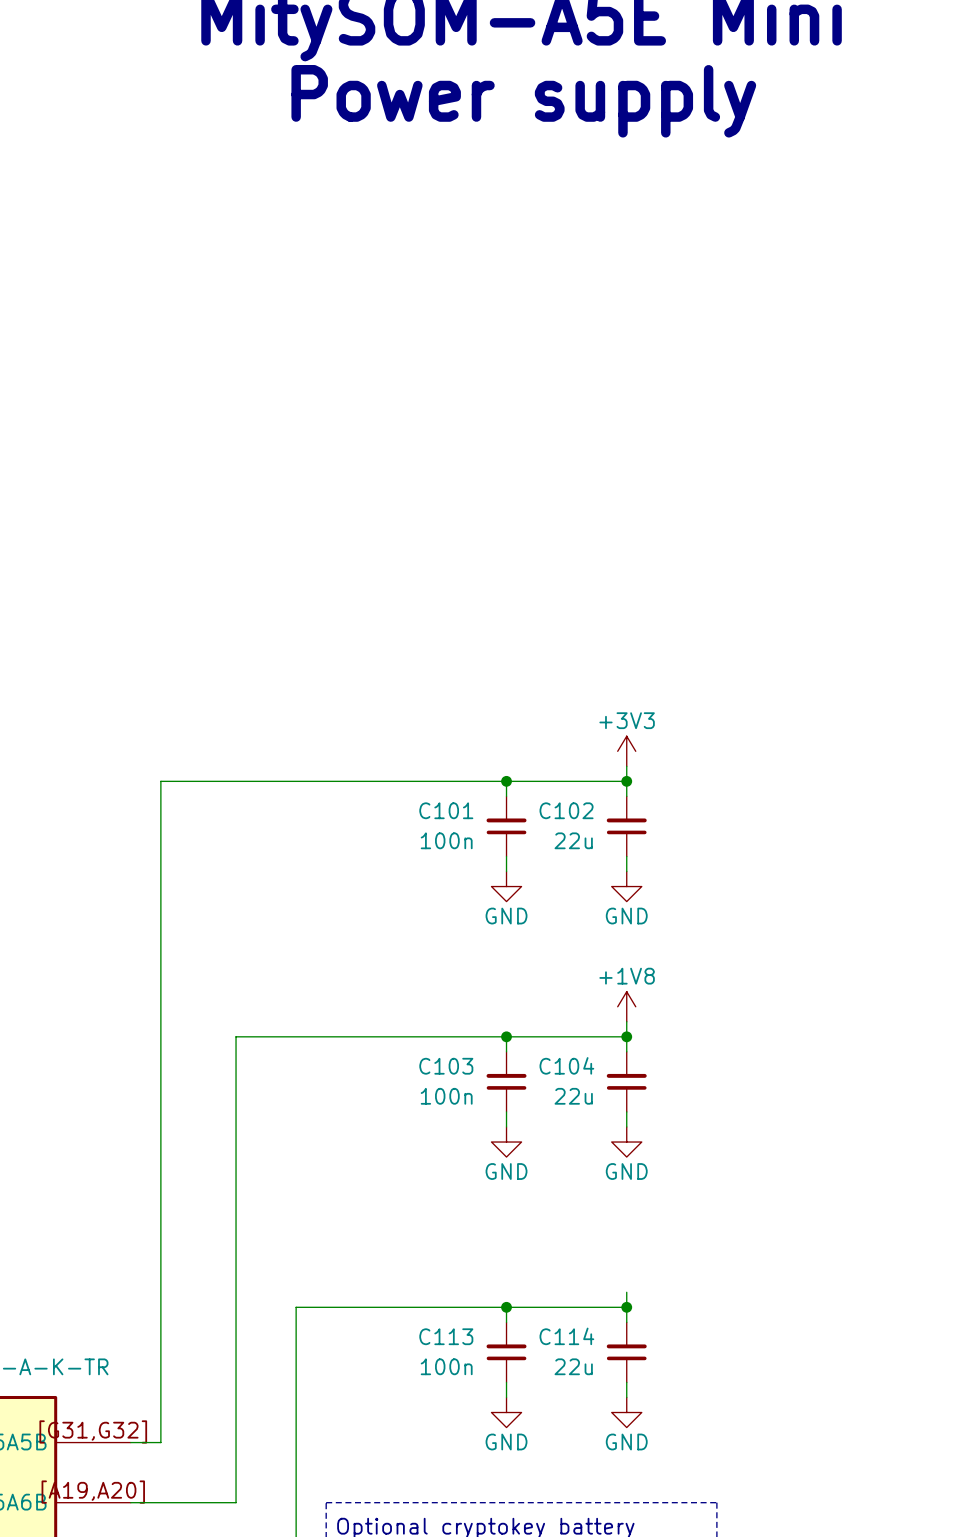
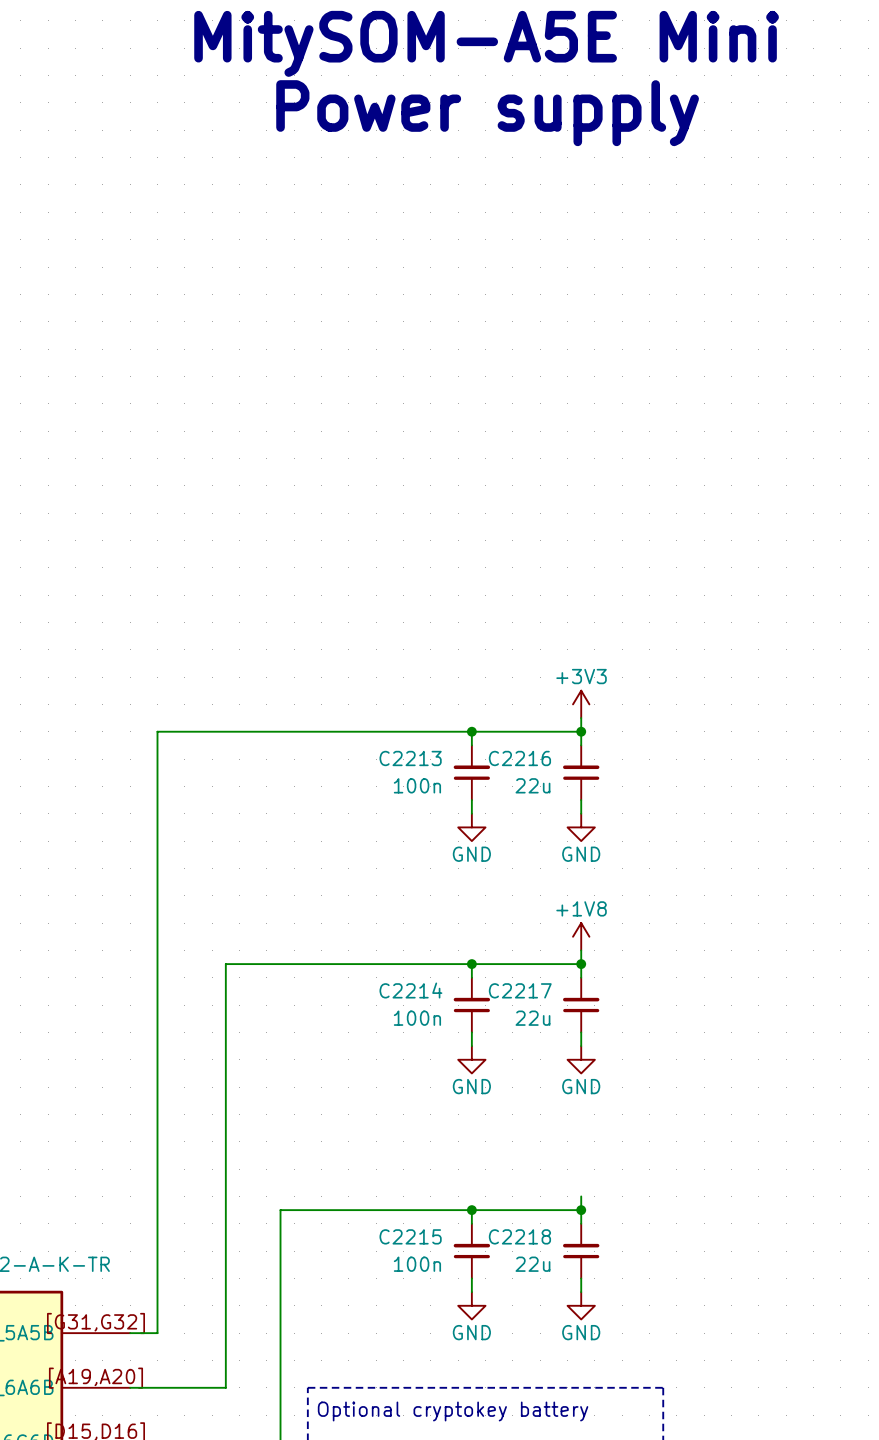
C101 name: C101 (446, 810) -> C2213 (410, 758)
C102 name: C102 (566, 810) -> C2216 (519, 758)
C104 name: C104 (566, 1065) -> C2217 (520, 990)
C103 name: C103 (446, 1066) -> C2214 (410, 990)
C113 name: C113 (446, 1336) -> C2215 (410, 1236)
C114 name: C114 (566, 1336) -> C2218 (519, 1236)

